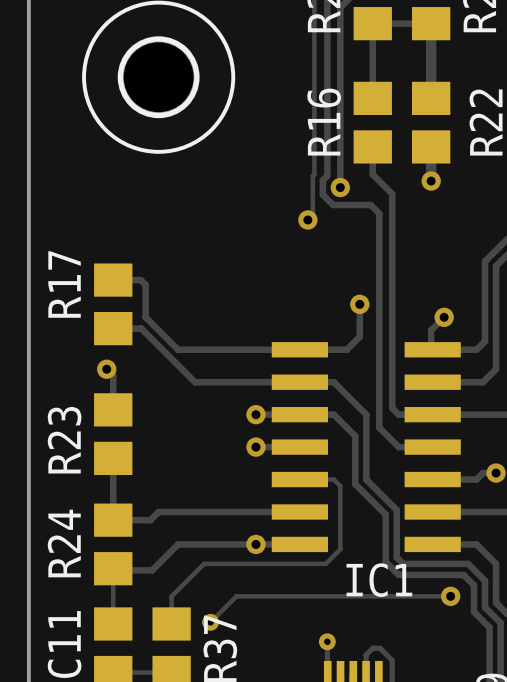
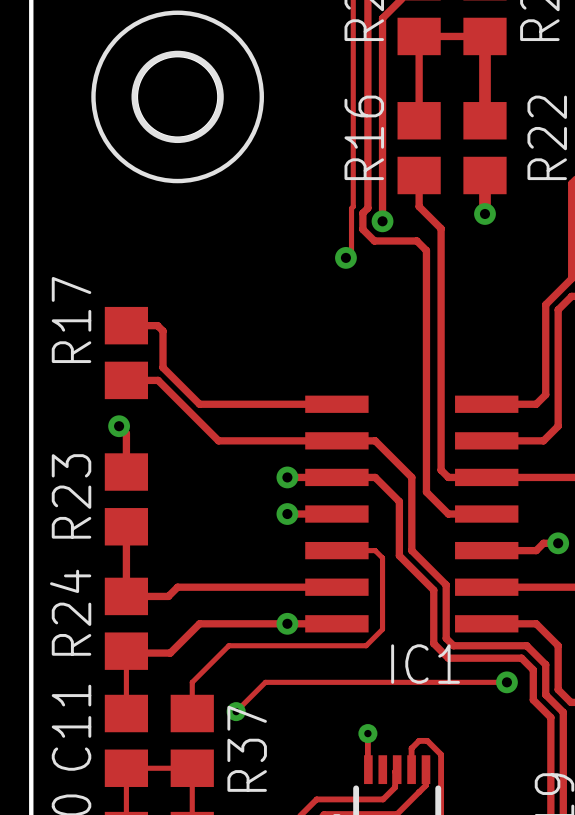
track: (359, 304) (359, 336) (346, 349) (299, 349) -> none
via: (359, 304) -> none
track: (444, 317) (431, 330) (432, 349) -> none
via: (444, 317) -> none

